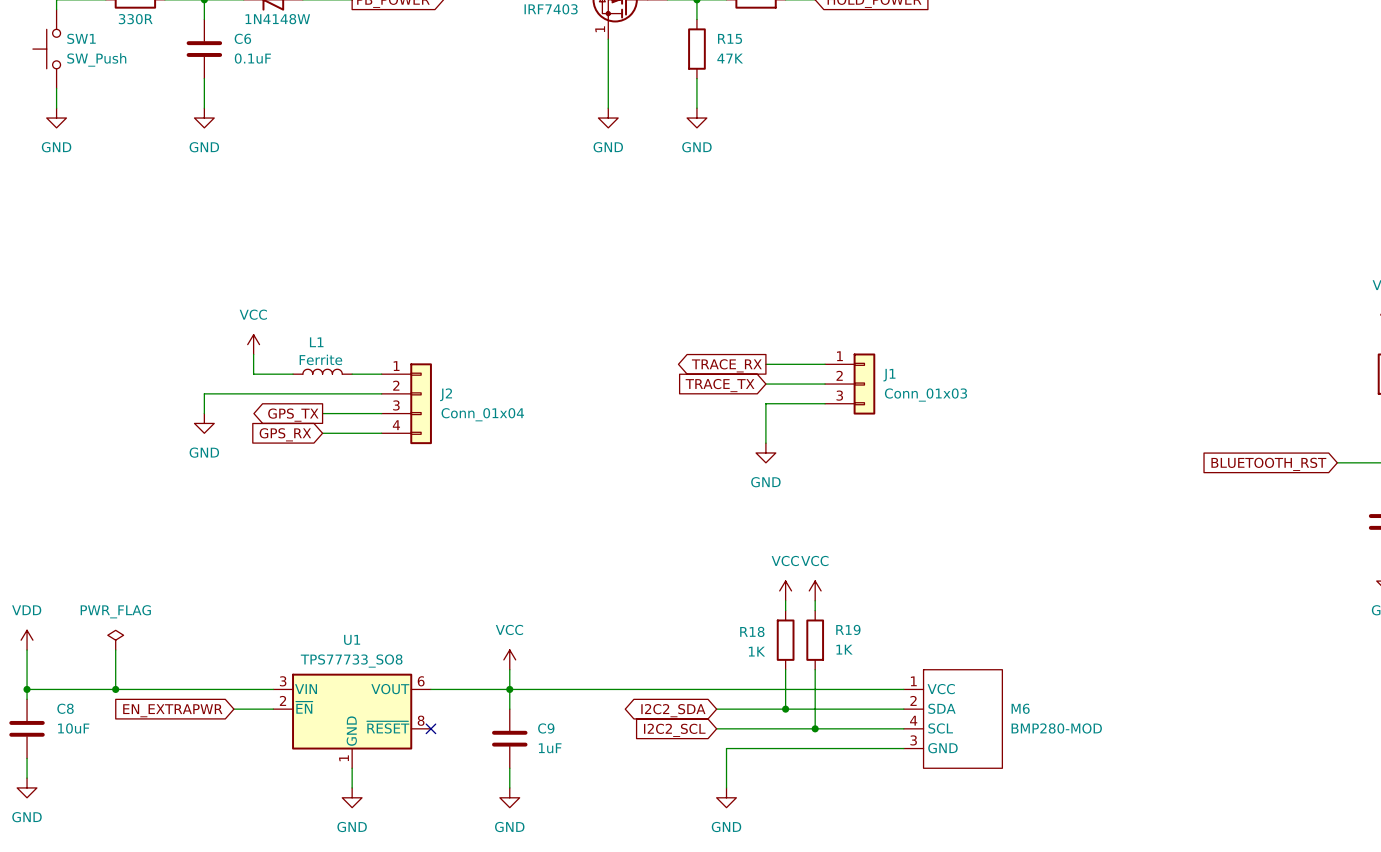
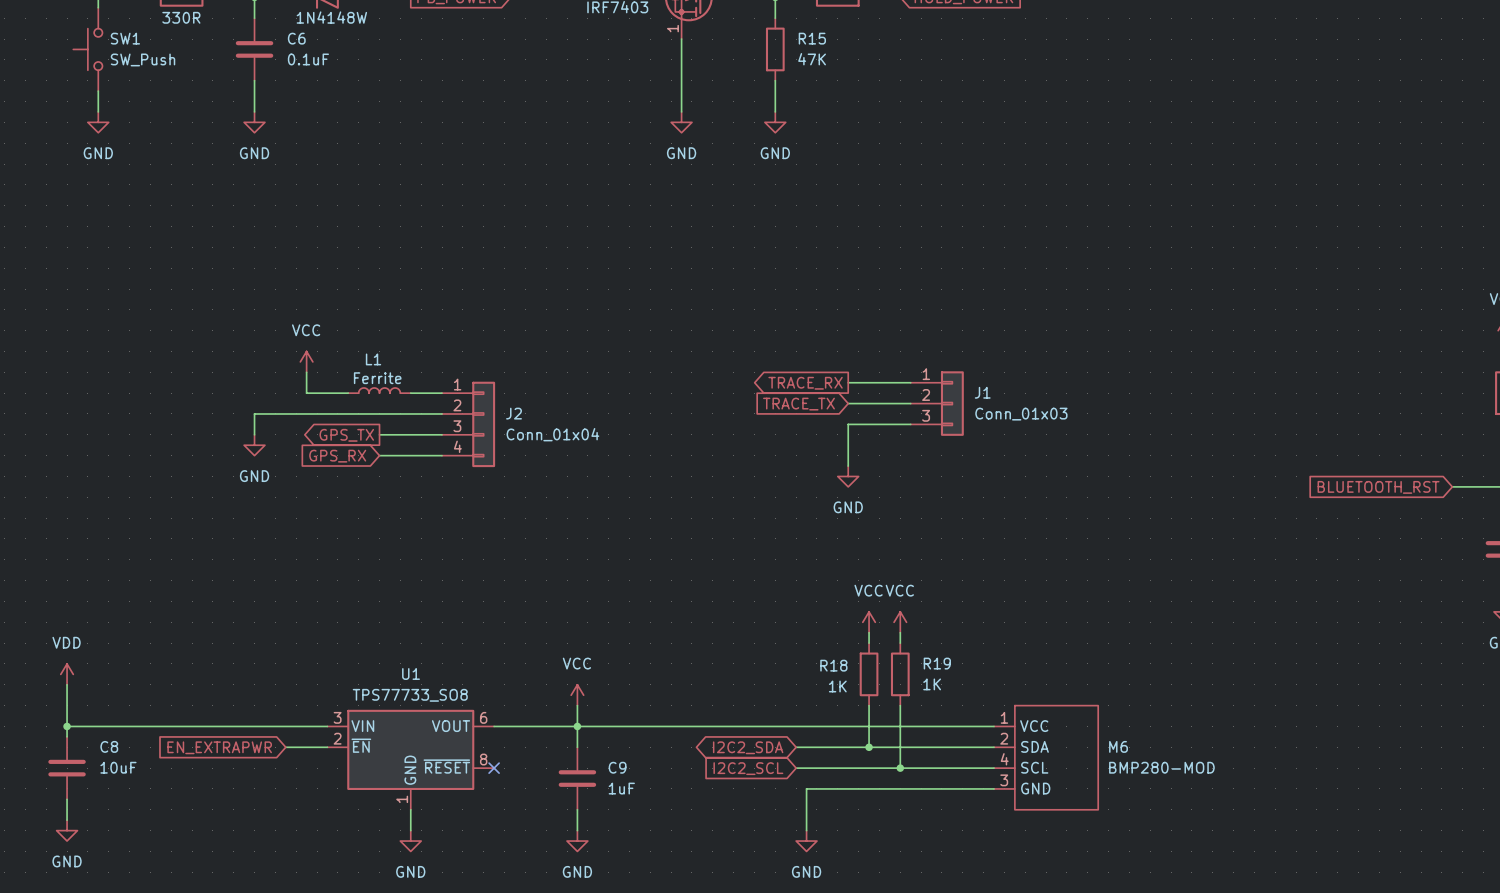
power symbol: PWR_FLAG (115, 640) -> none
wire: (115, 650) (115, 689) -> none
junction: (115, 689) -> none

